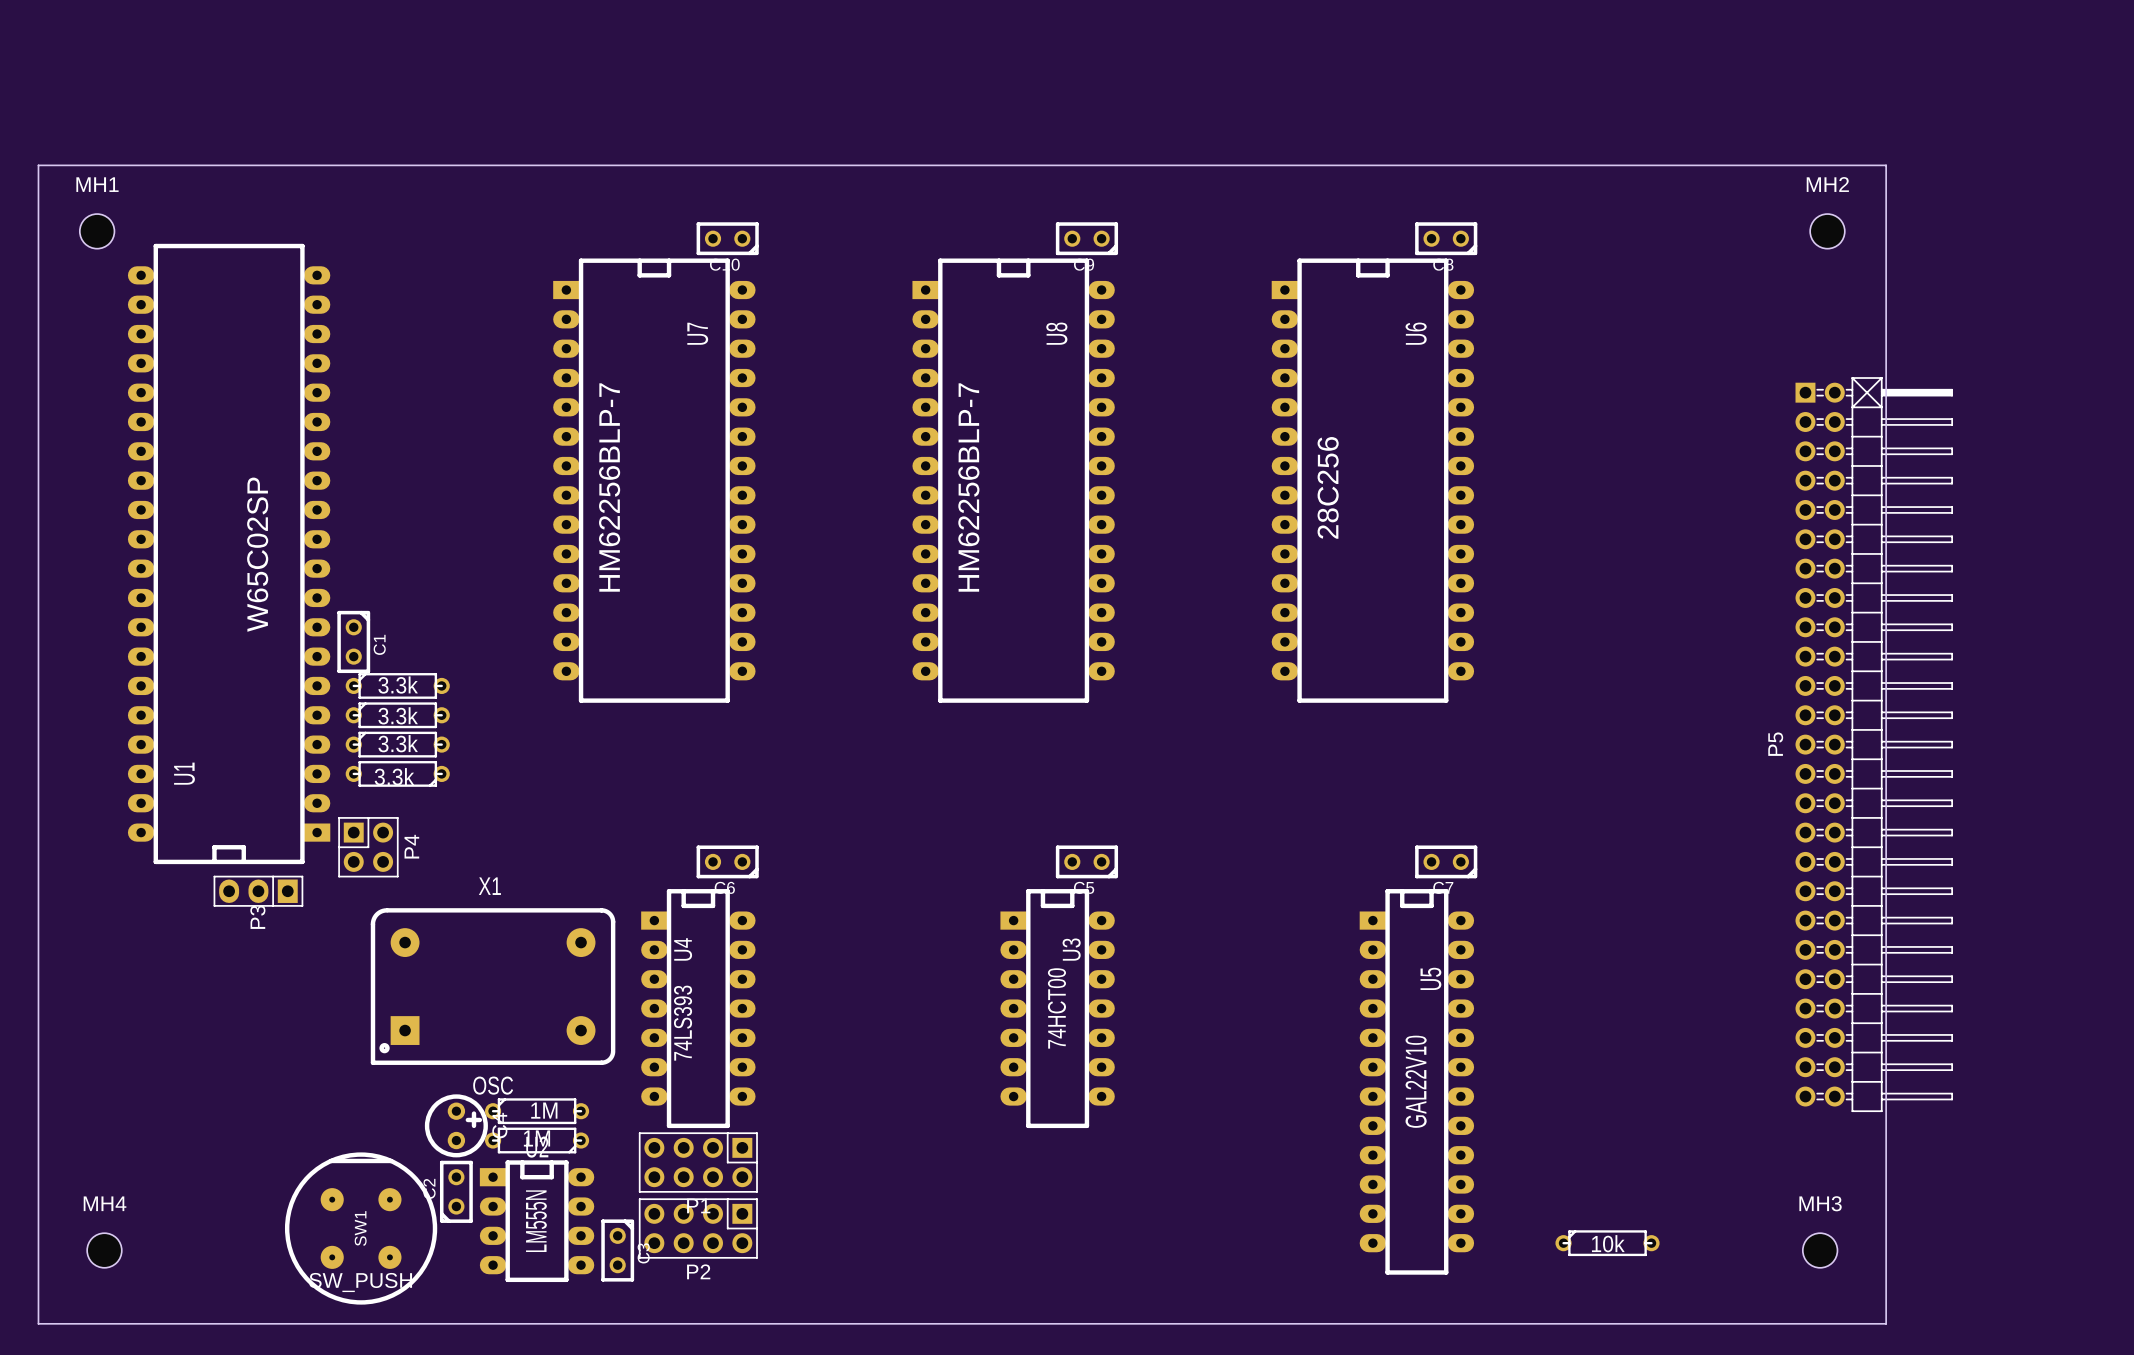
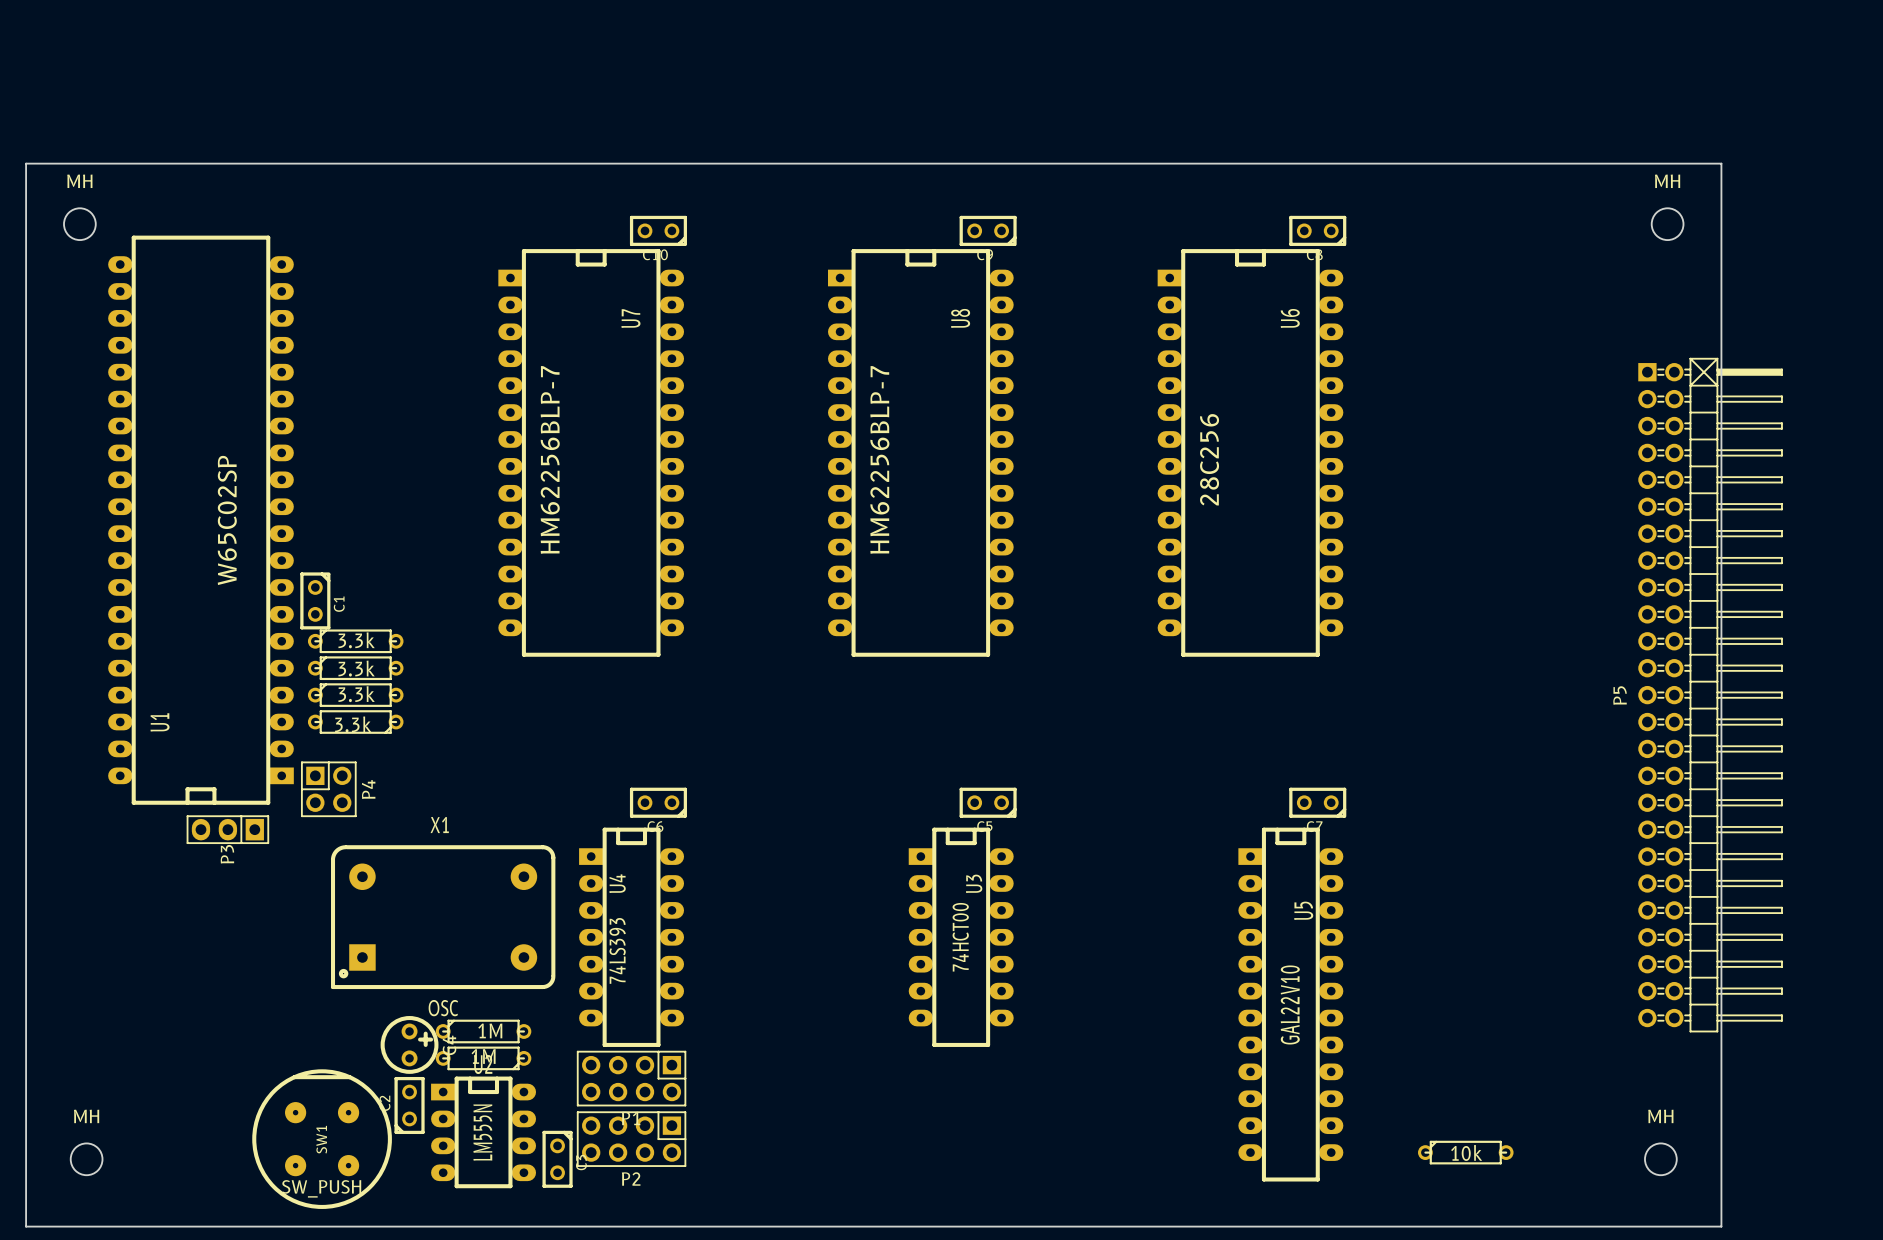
MH1 name: MH1 (97, 184) -> MH (79, 181)
MH2 name: MH2 (1827, 184) -> MH (1667, 181)
MH4 name: MH4 (105, 1203) -> MH (86, 1116)
MH3 name: MH3 (1820, 1203) -> MH (1660, 1116)

